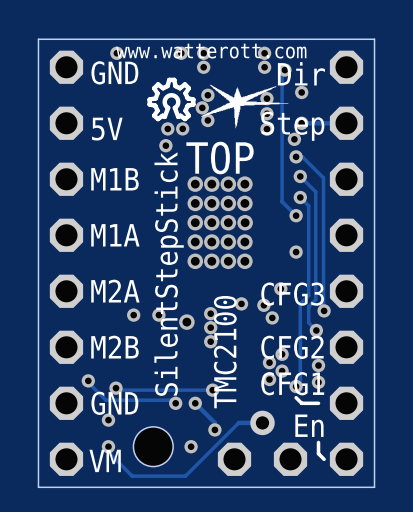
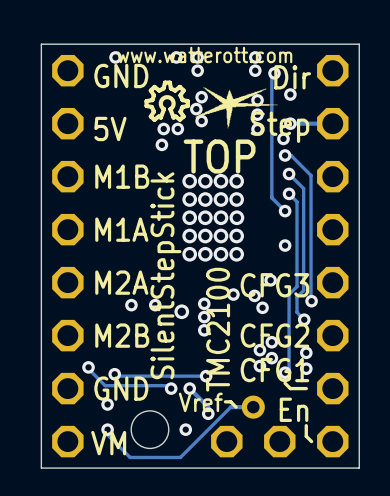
text: none -> Vref (200, 402)
line: none -> (225, 401) (230, 401) (236, 407)

